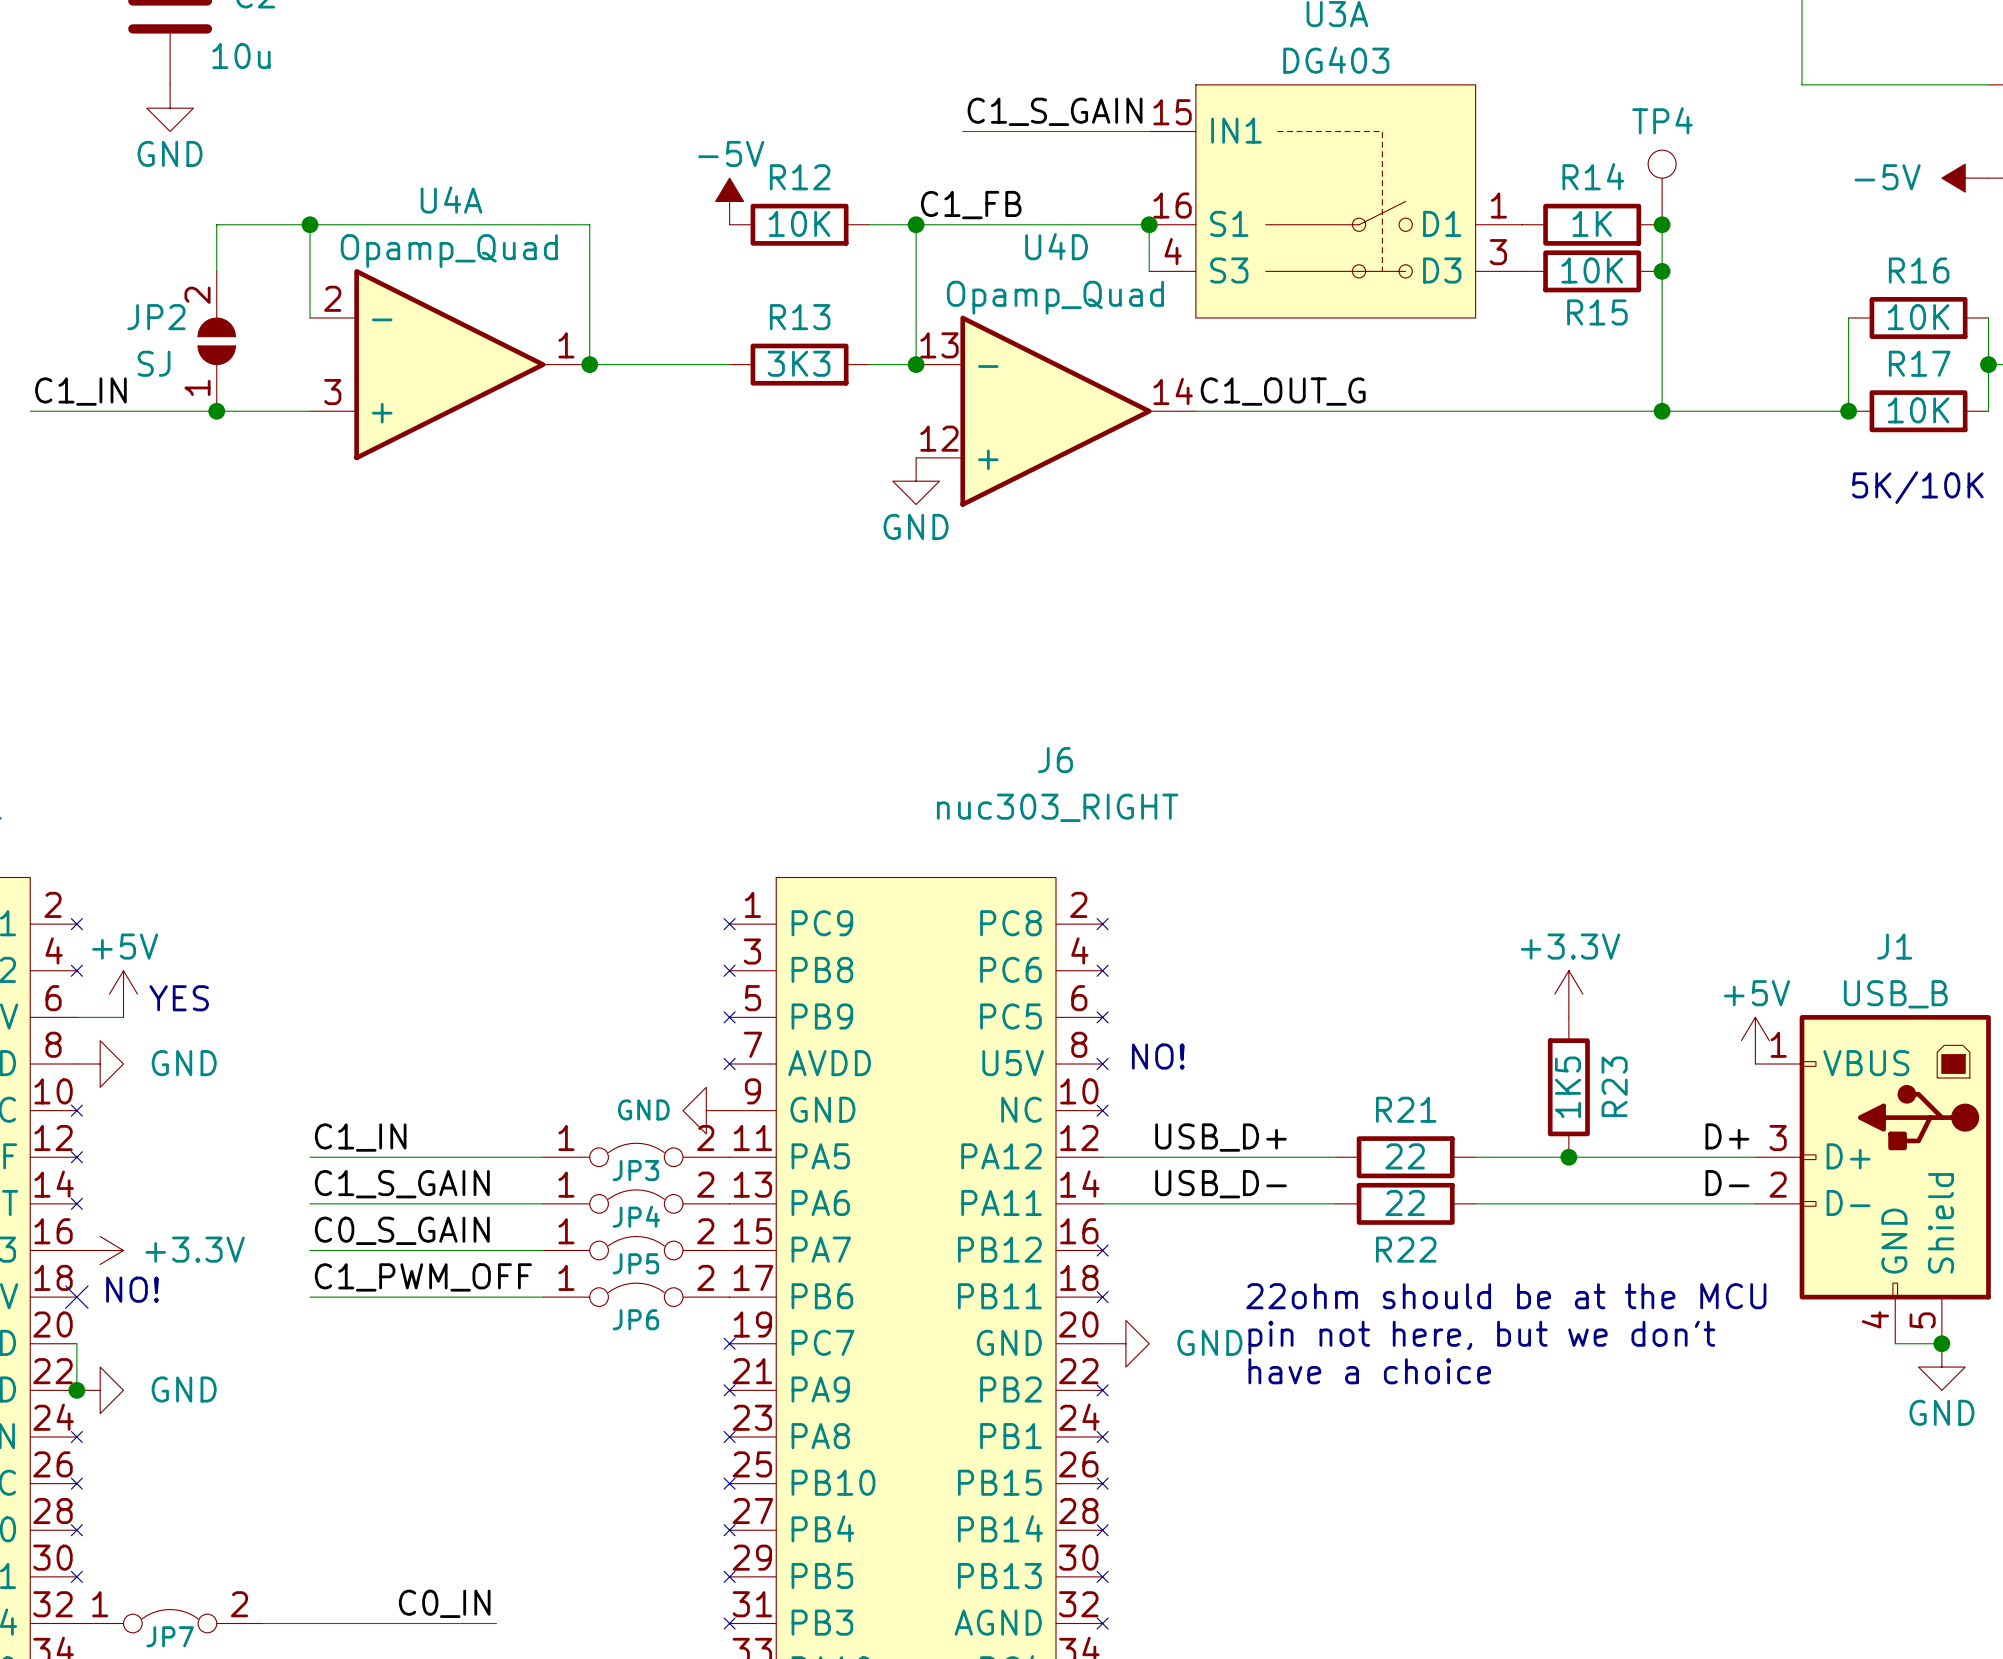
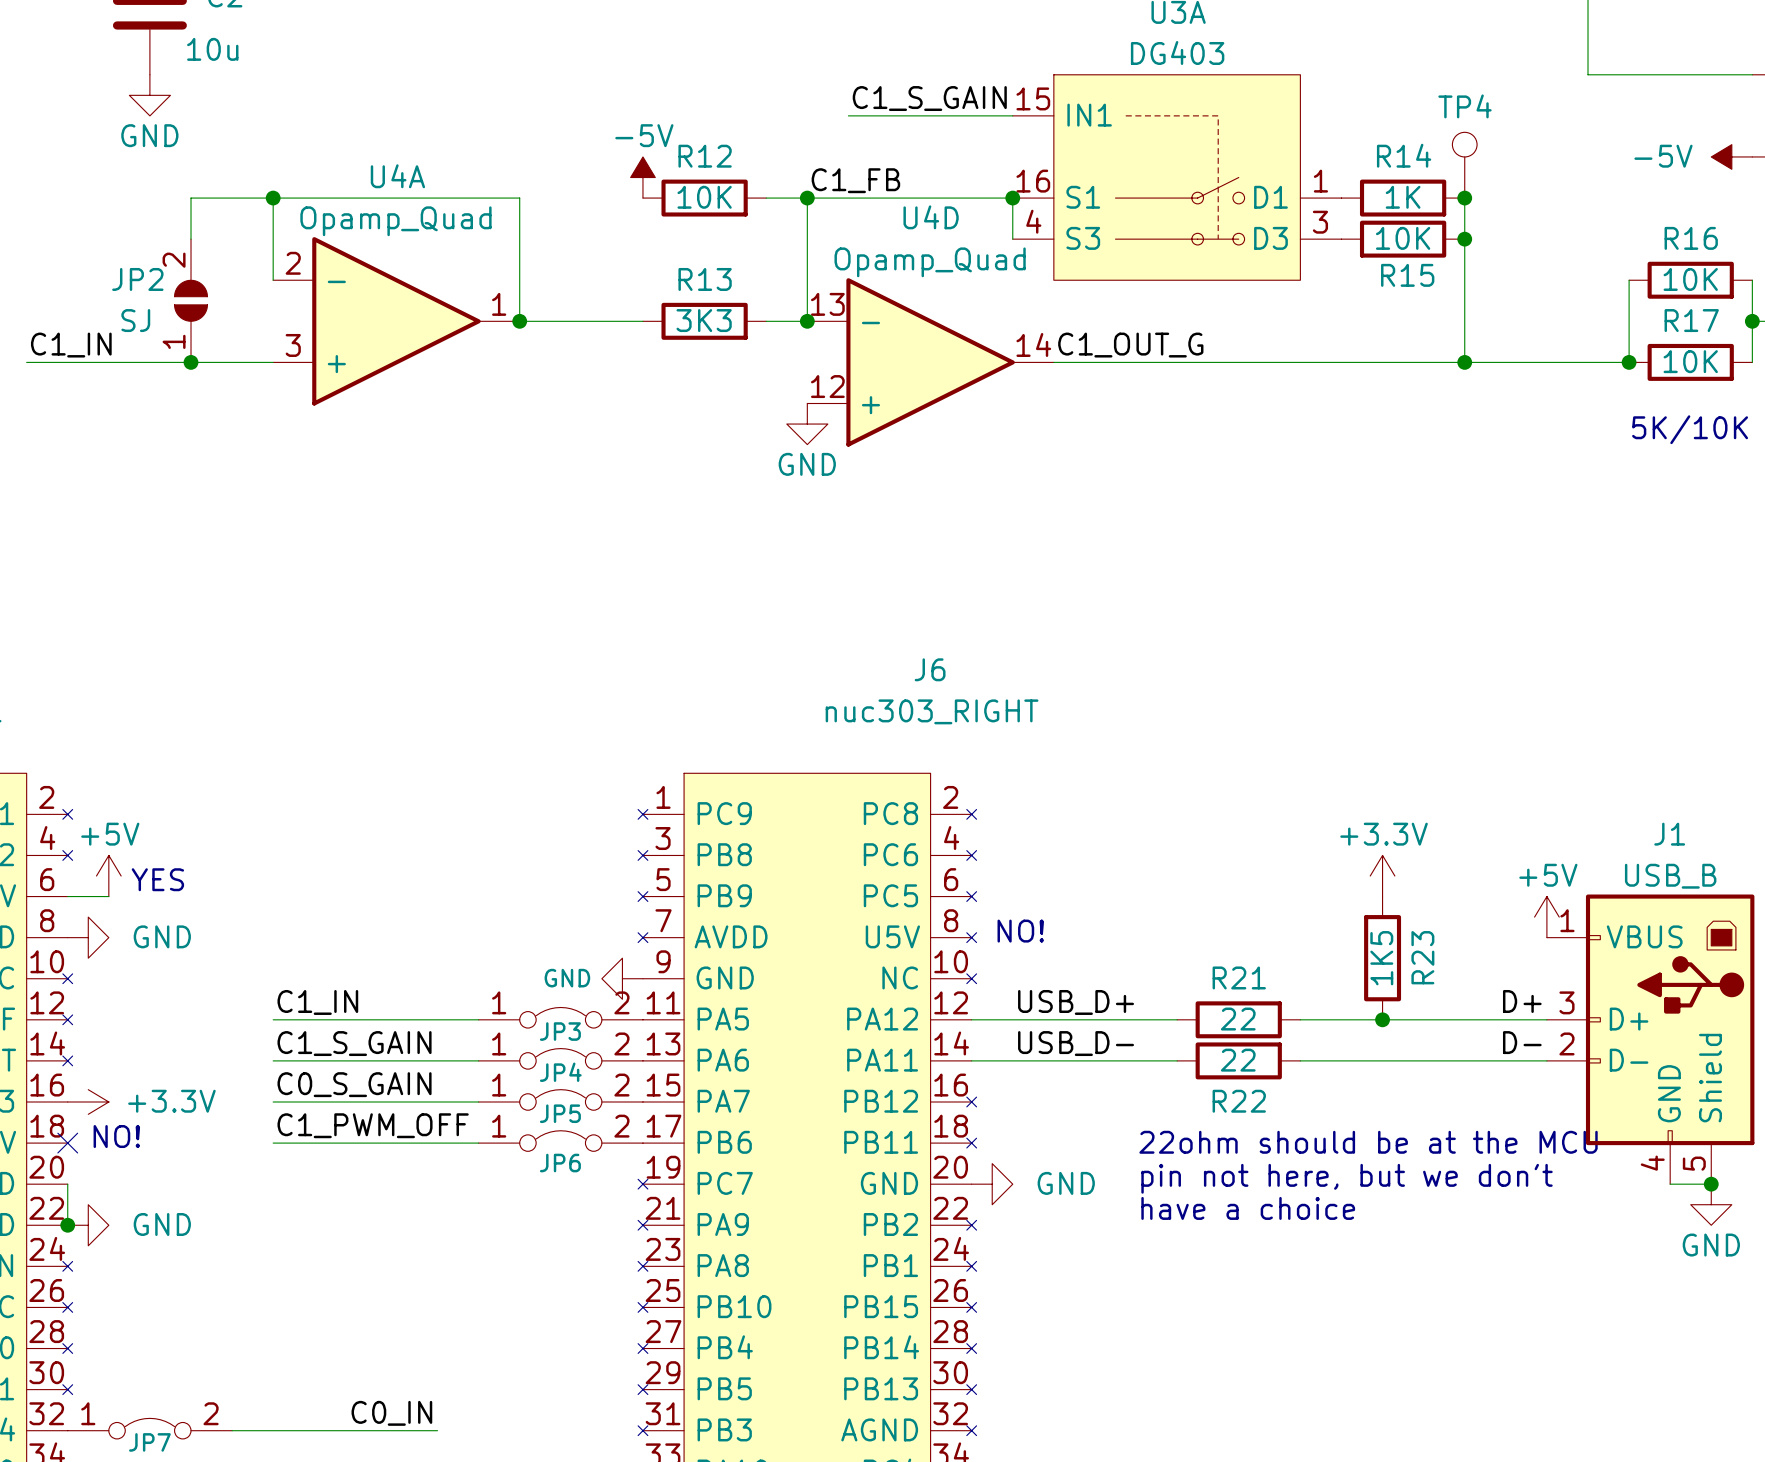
text position: 22ohm should be at the MCU (1506, 1296) -> 22ohm should be at the MCU (1368, 1142)
text position: pin not here, but we don't (1481, 1337) -> pin not here, but we don't (1347, 1178)
text position: have a choice (1369, 1371) -> have a choice (1248, 1208)

